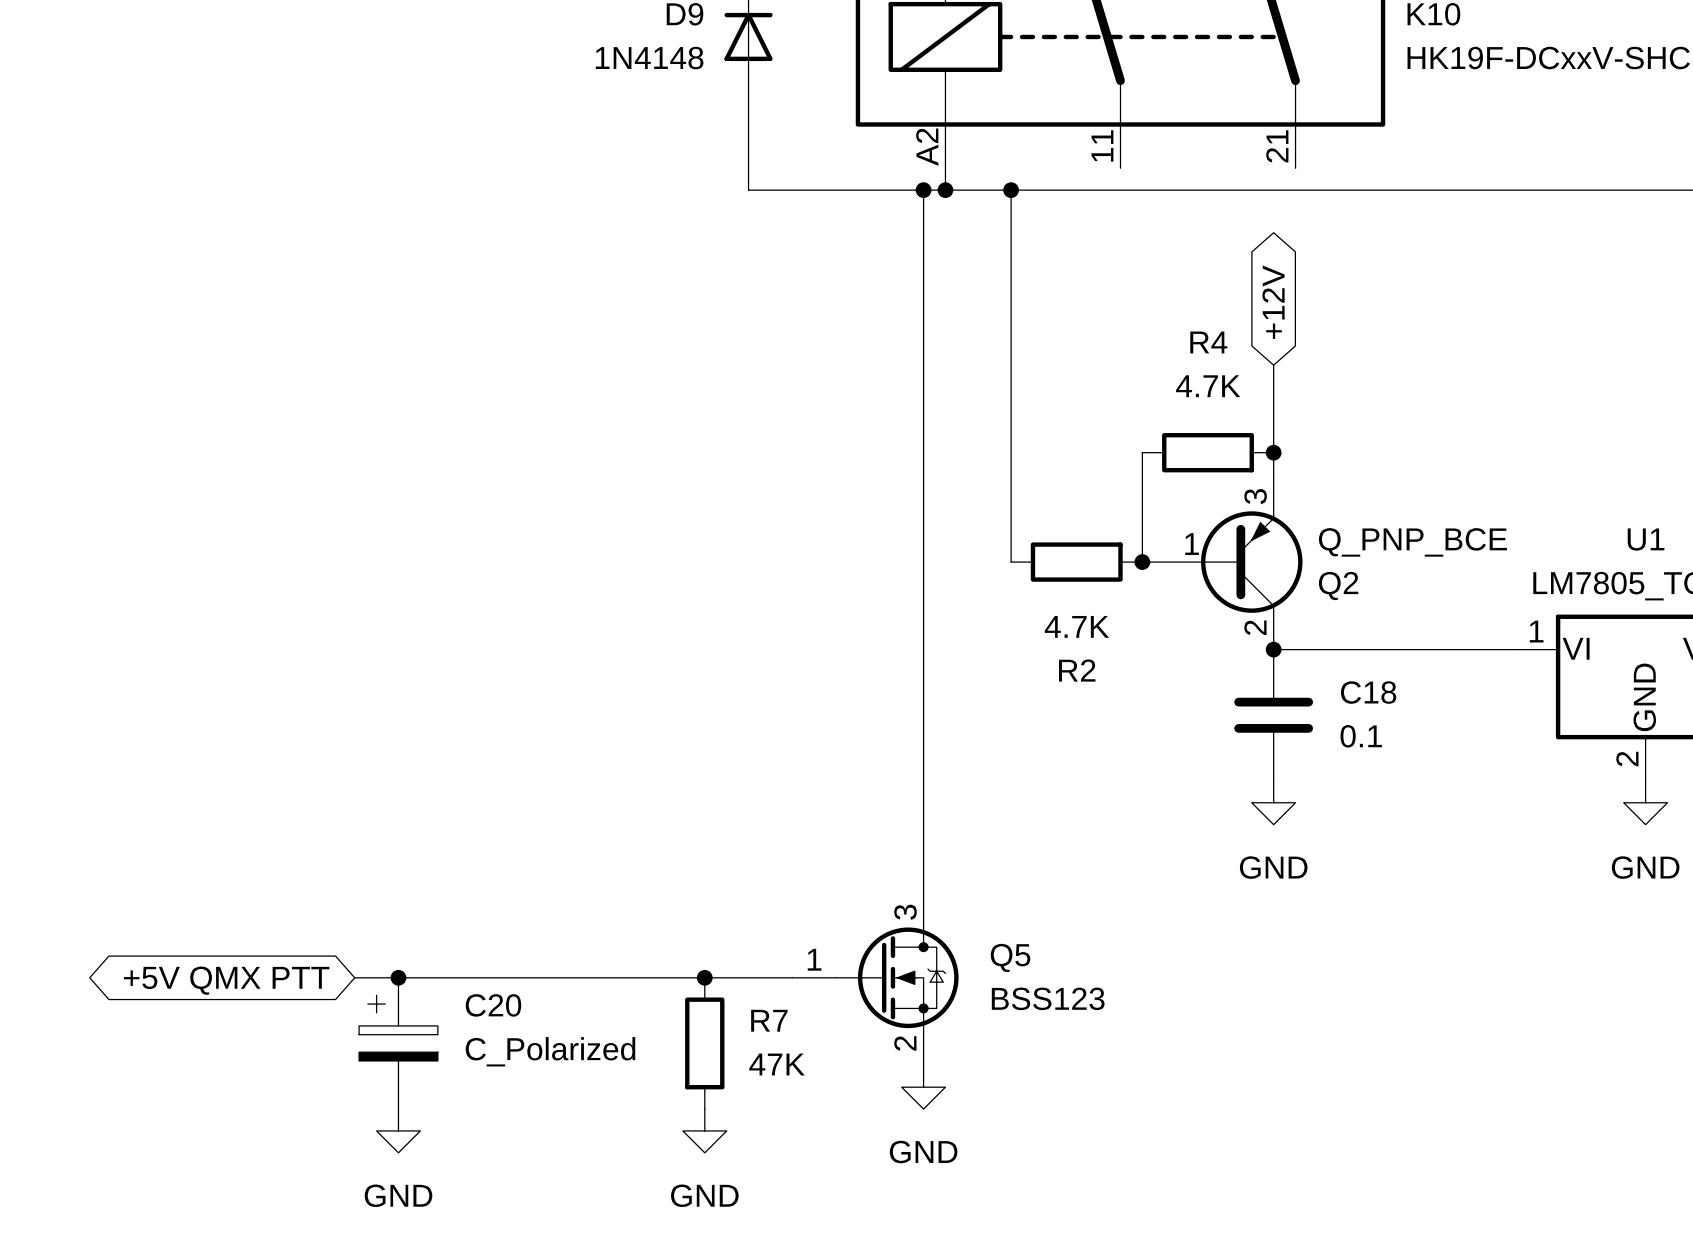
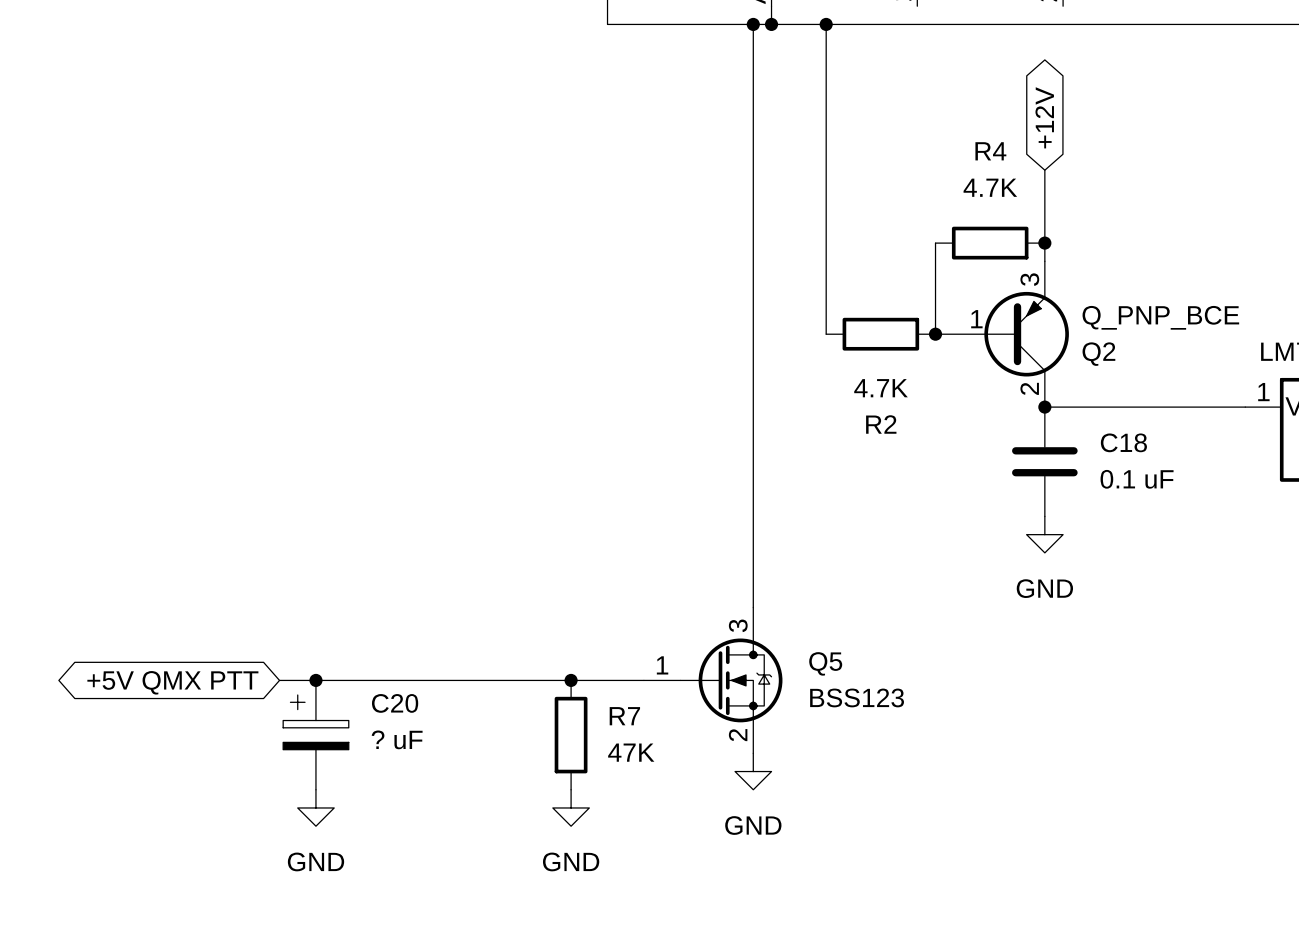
C18 value: 0.1 (1361, 736) -> 0.1 uF (1137, 479)
C20 value: C_Polarized (550, 1051) -> ? uF (397, 739)

